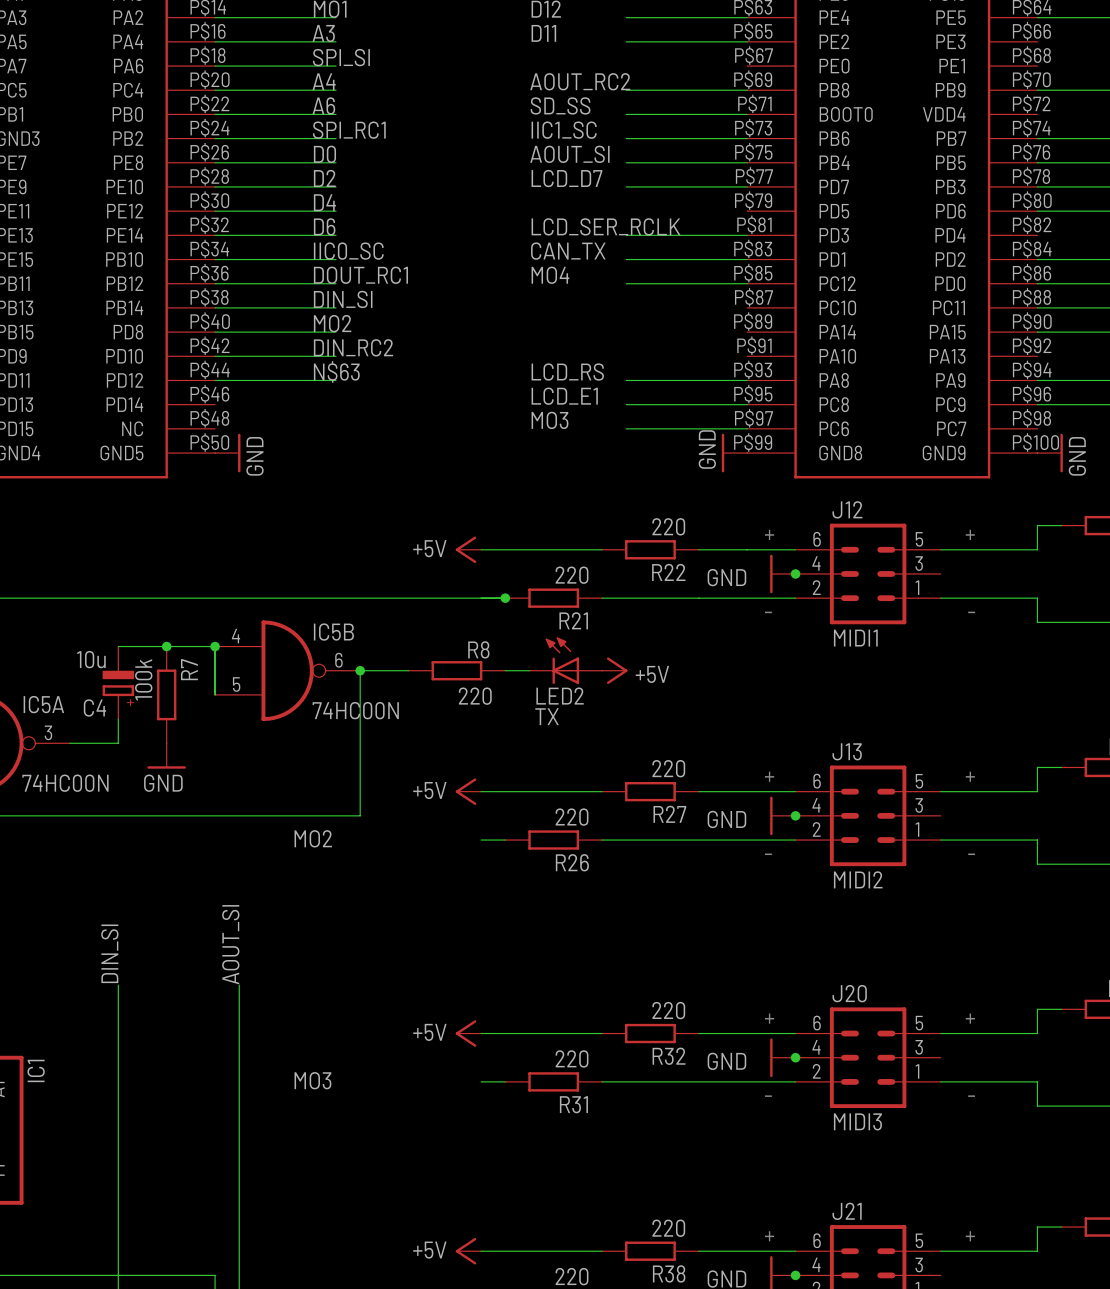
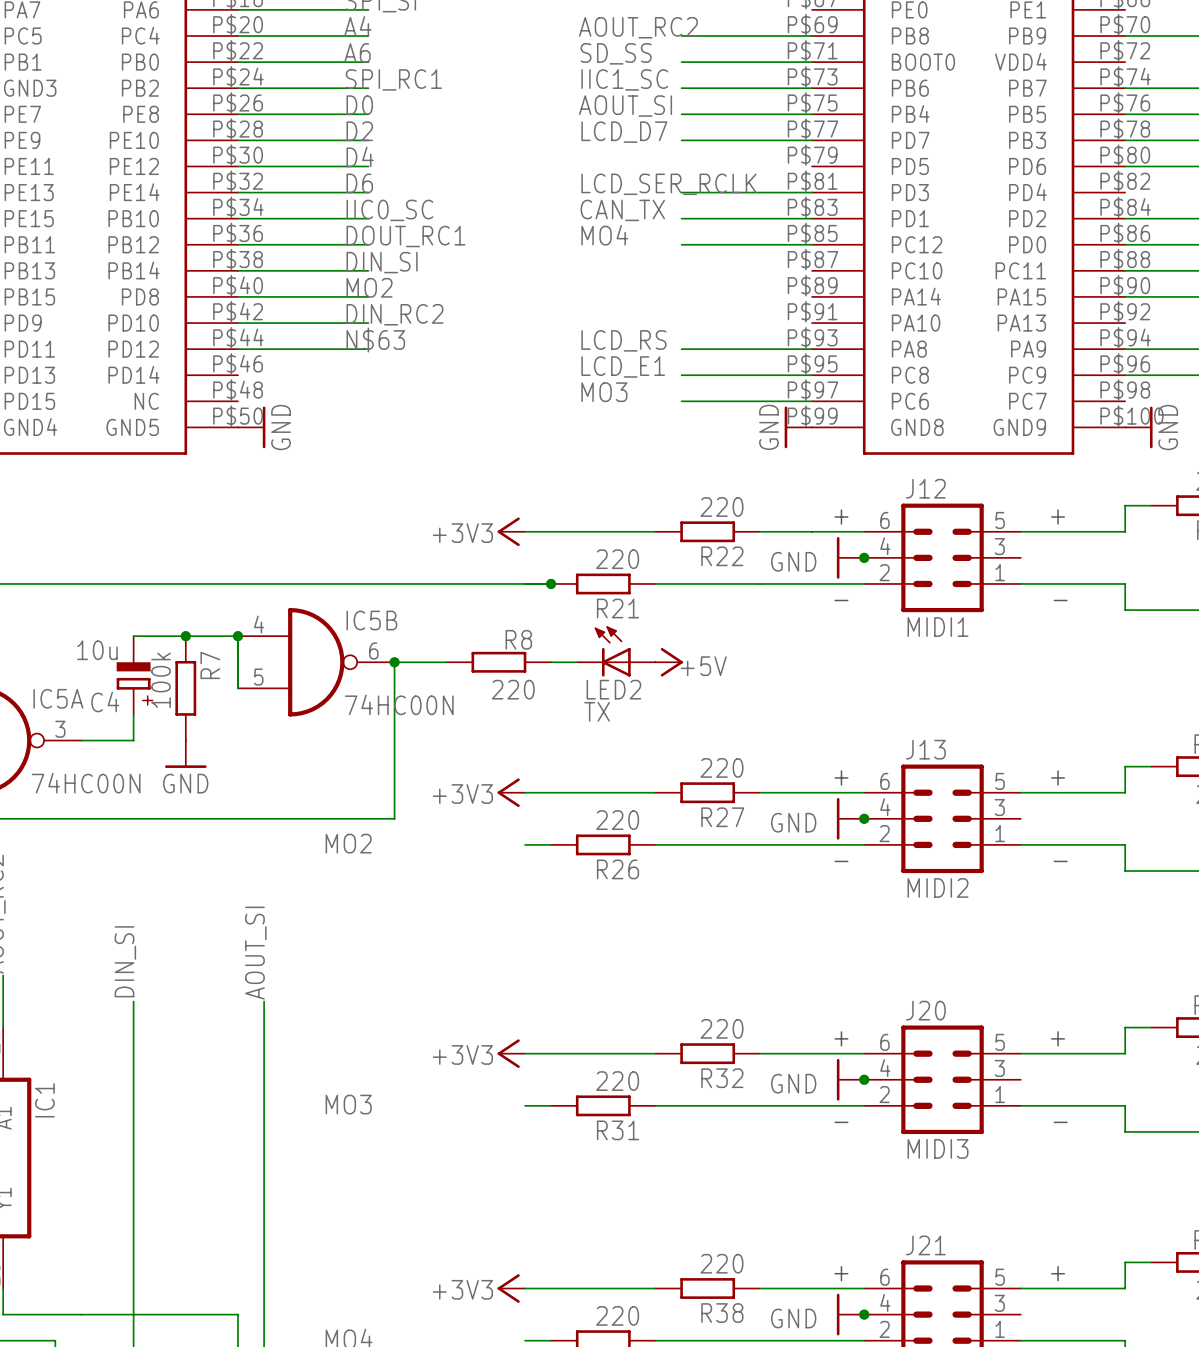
power symbol: +5V (468, 549) -> +3V3 (511, 531)
power symbol: +5V (468, 791) -> +3V3 (511, 792)
power symbol: +5V (468, 1033) -> +3V3 (511, 1053)
power symbol: +5V (468, 1251) -> +3V3 (511, 1288)

